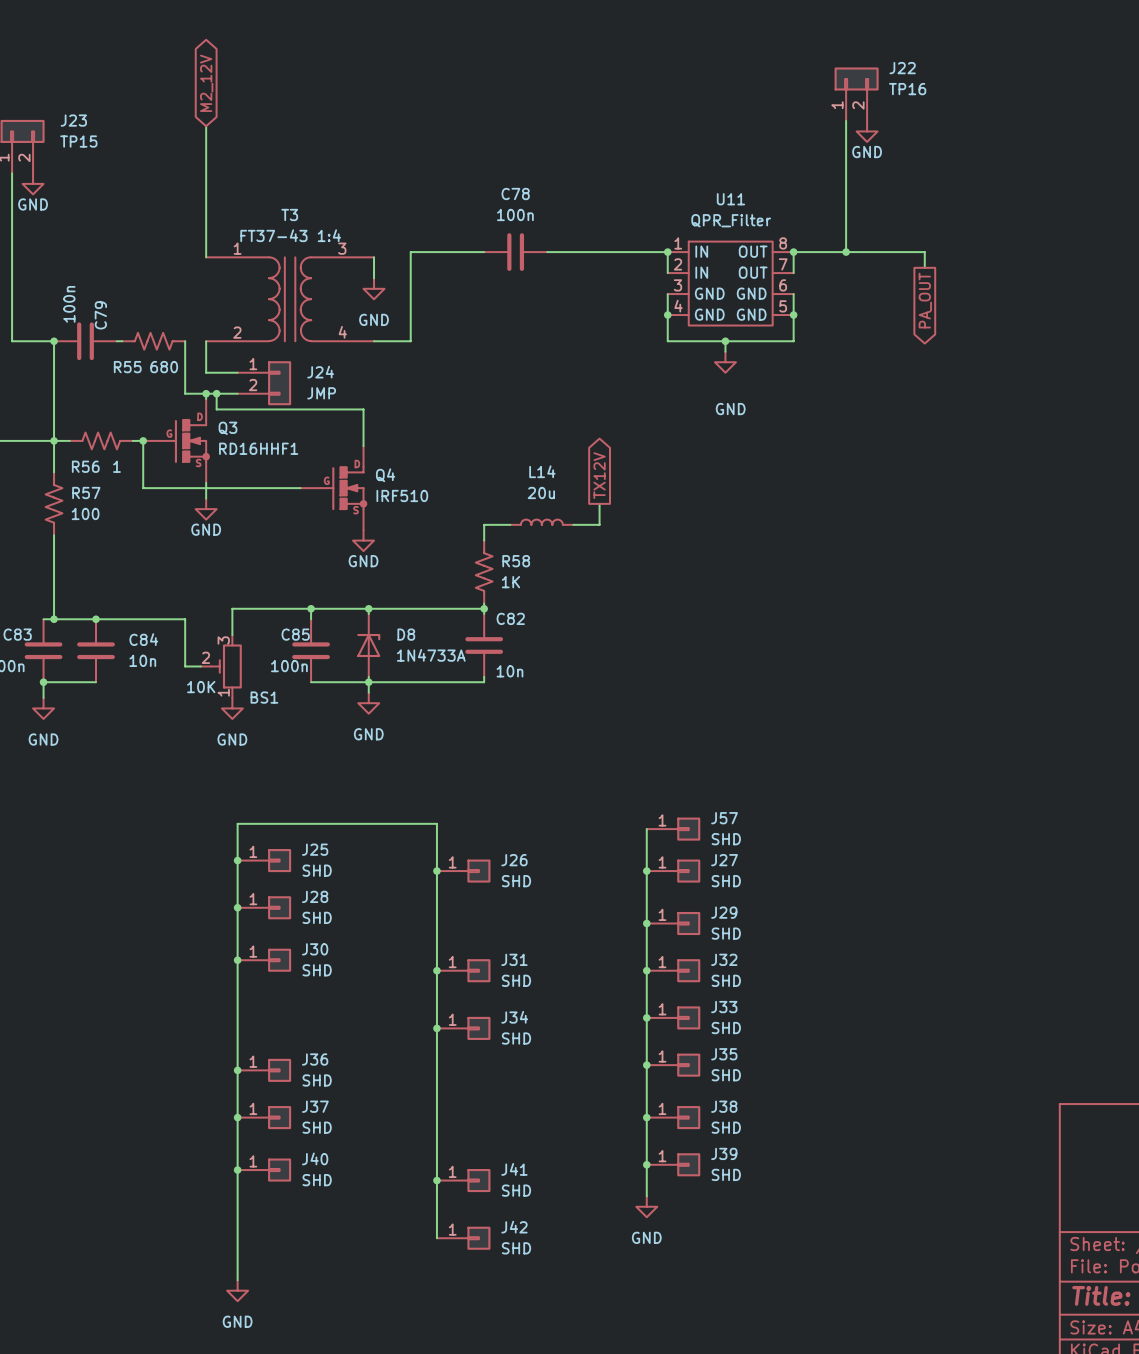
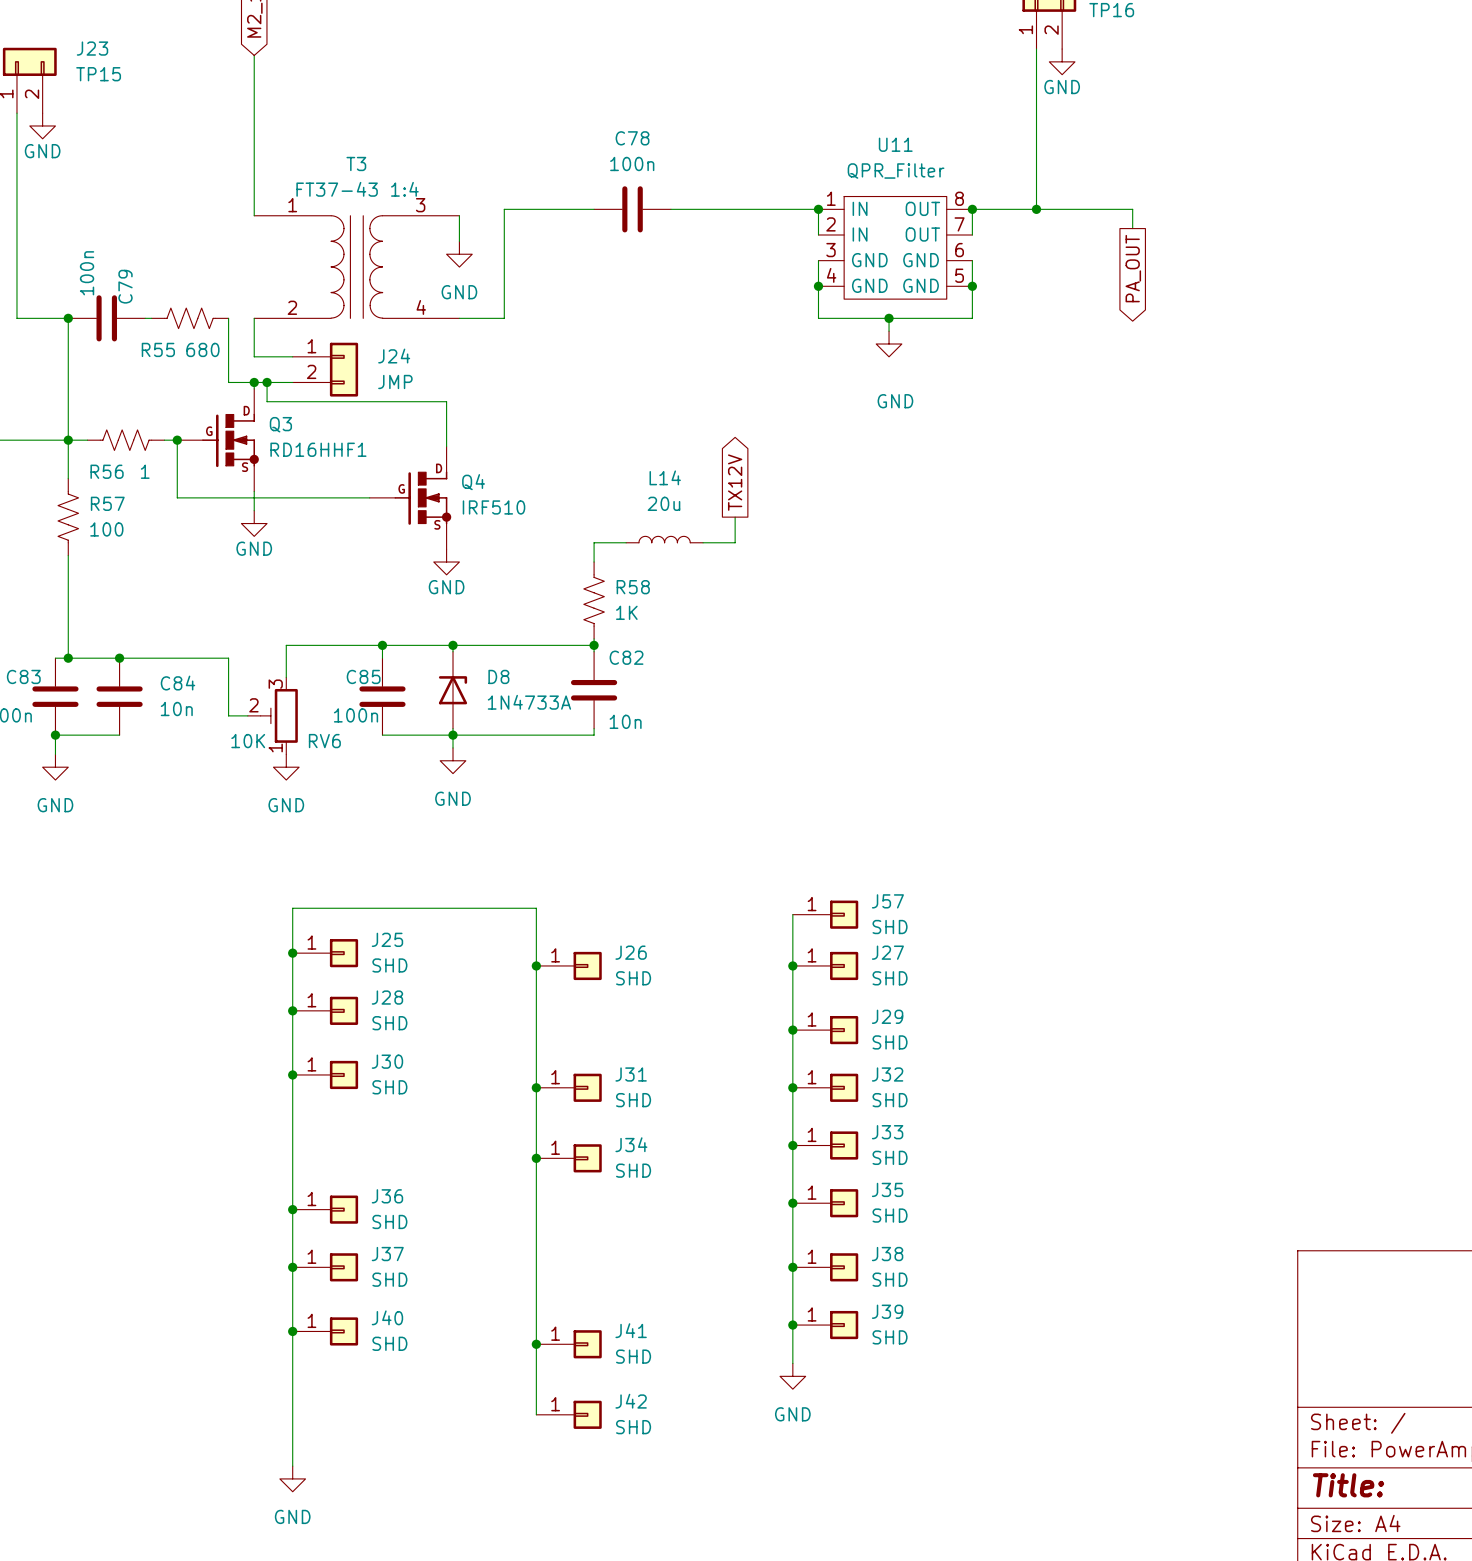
BS1 name: BS1 (264, 697) -> RV6 (324, 741)

